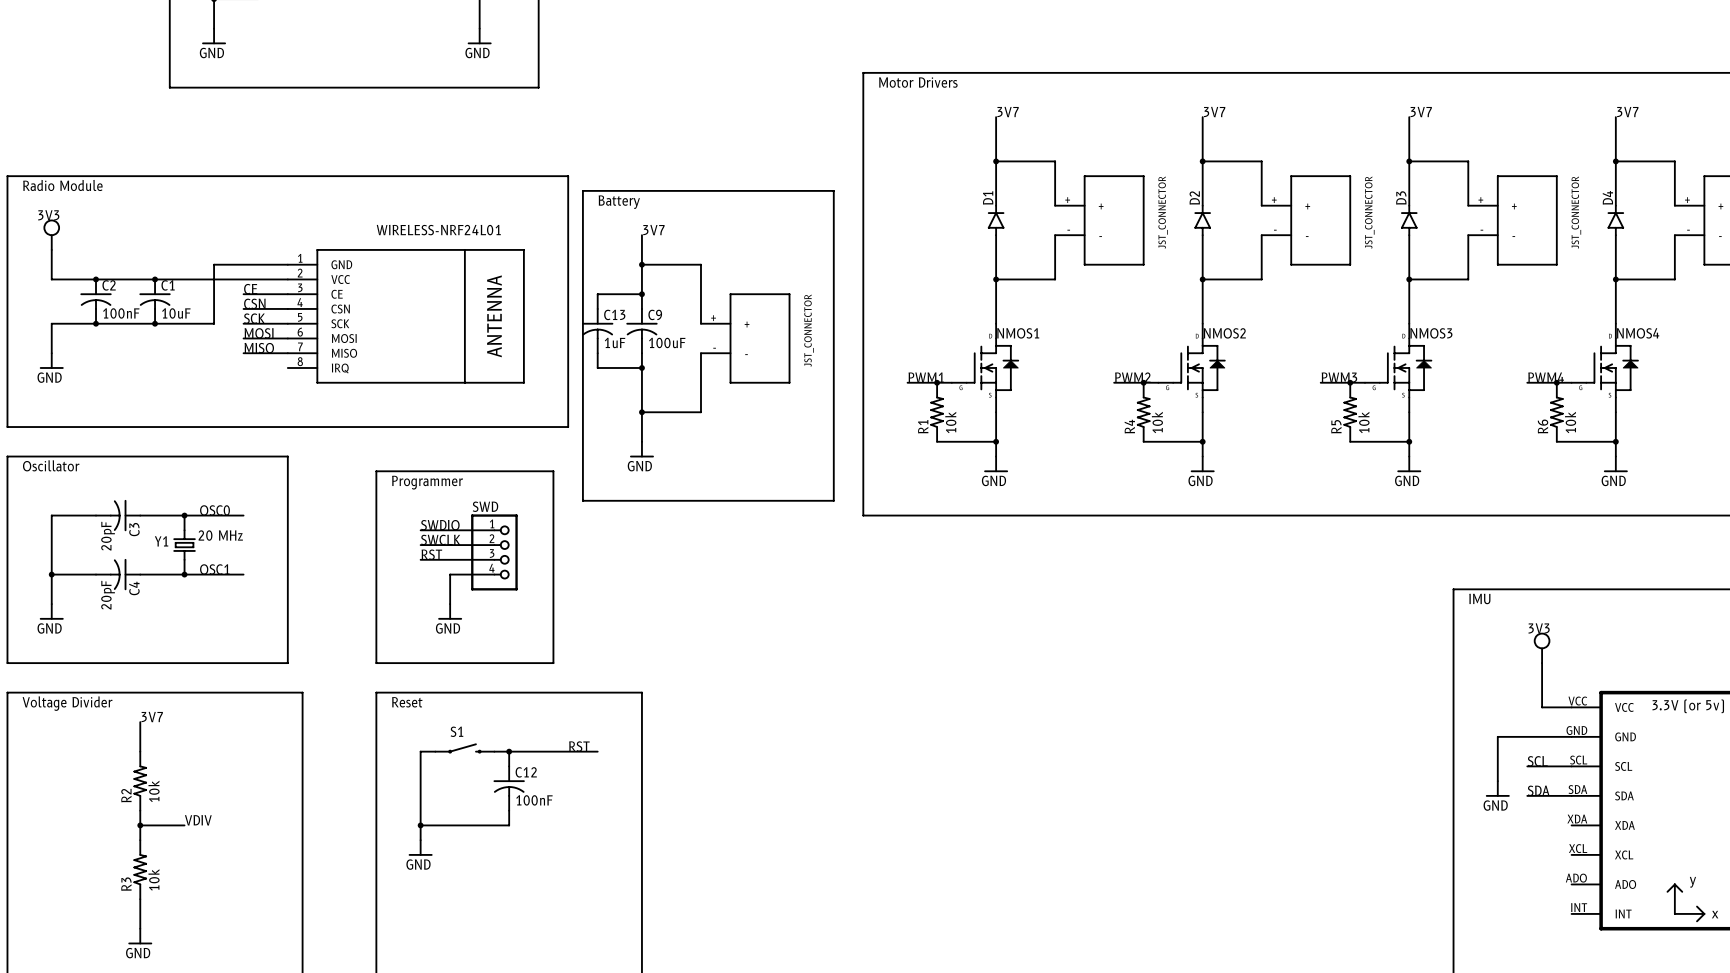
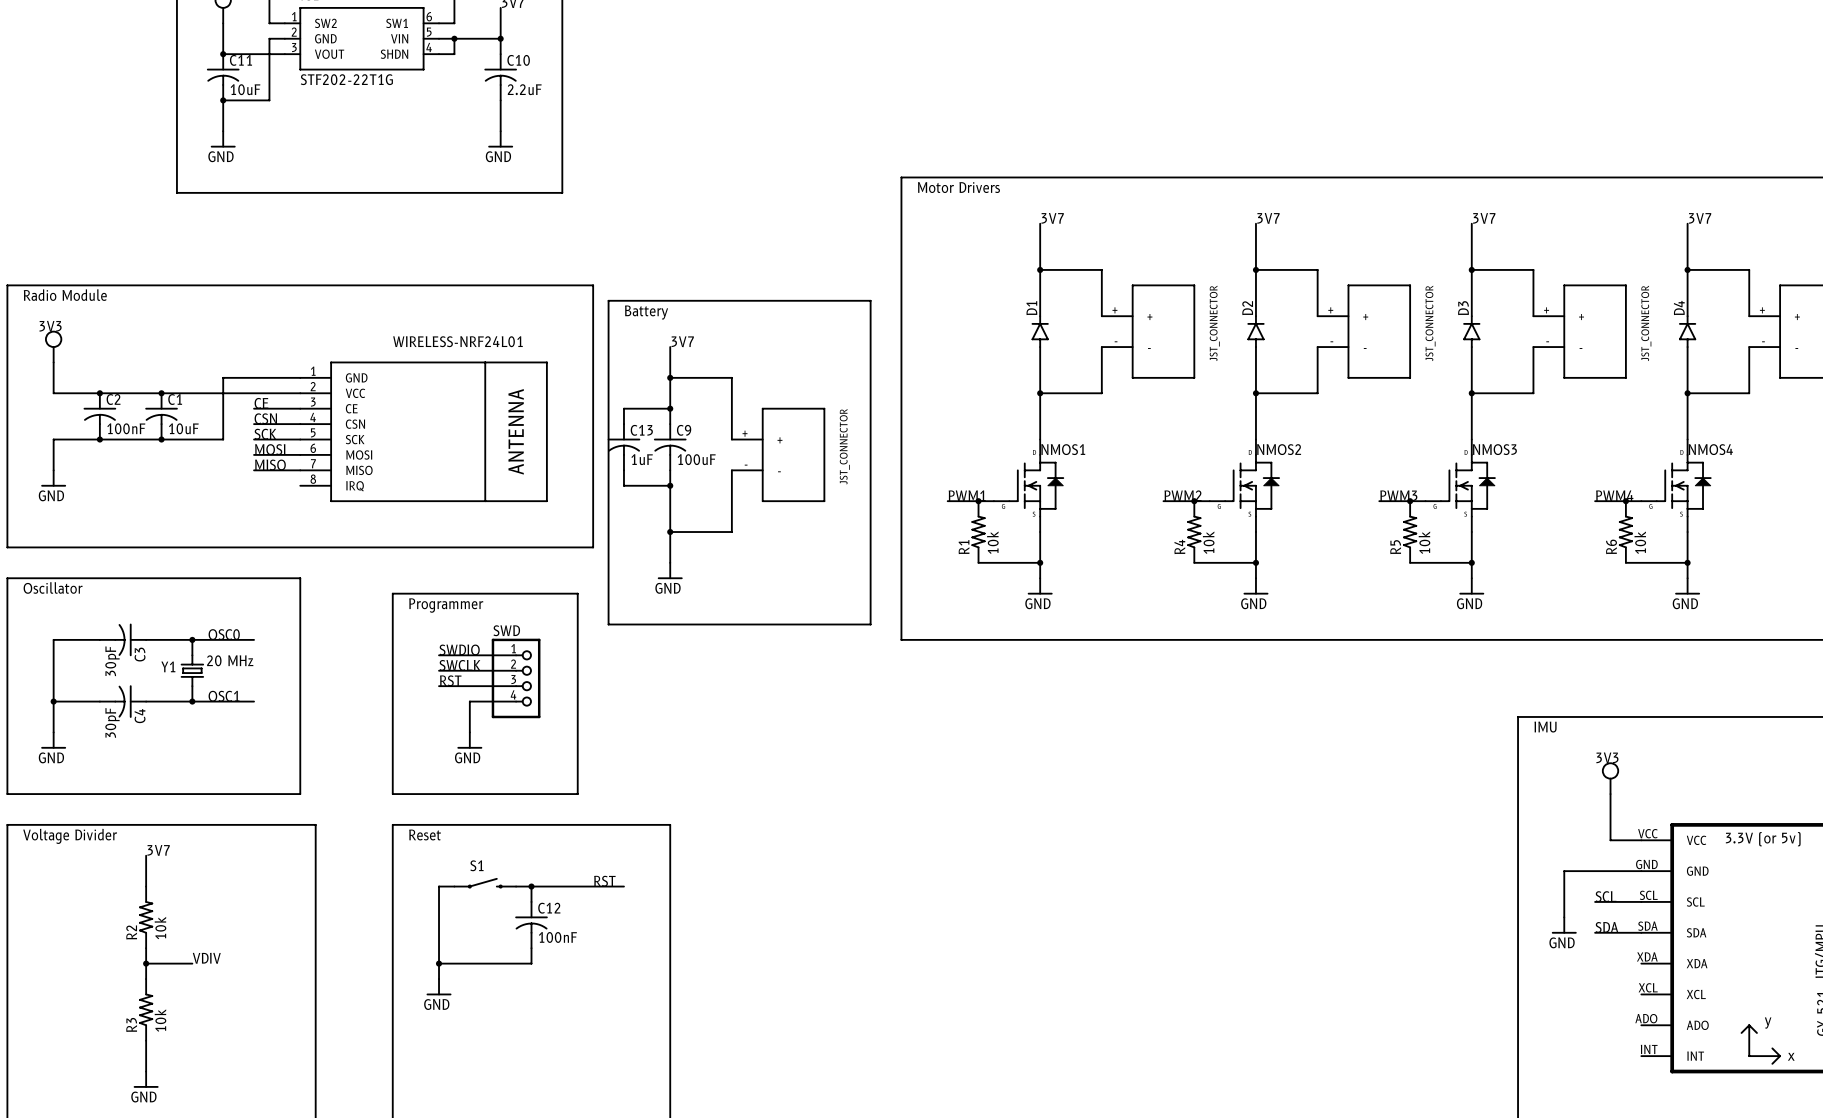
C3 value: 20pF (108, 536) -> 30pF (112, 661)
C4 value: 20pF (108, 595) -> 30pF (112, 722)

